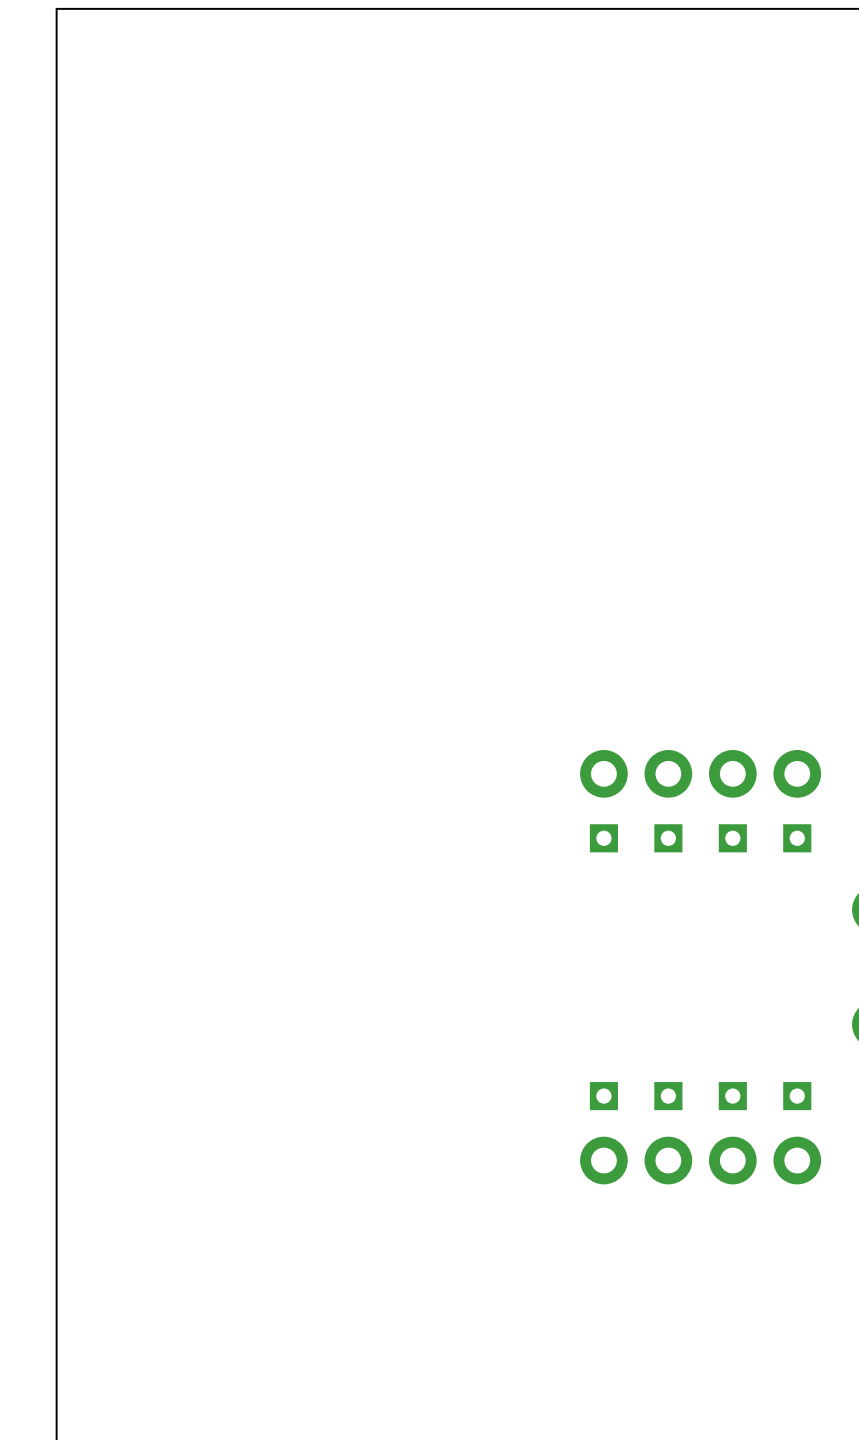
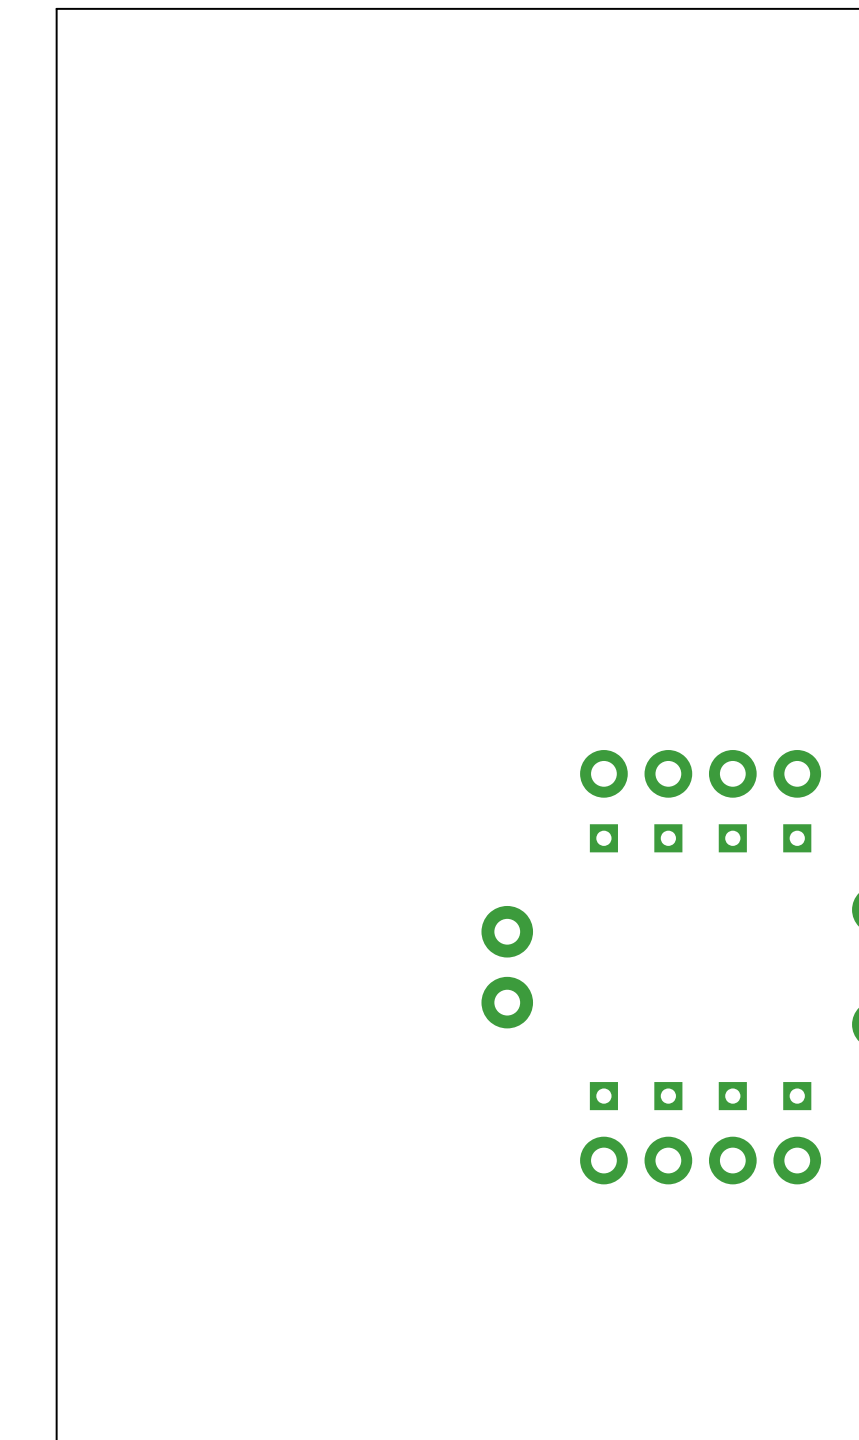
part: none -> (507, 967)

